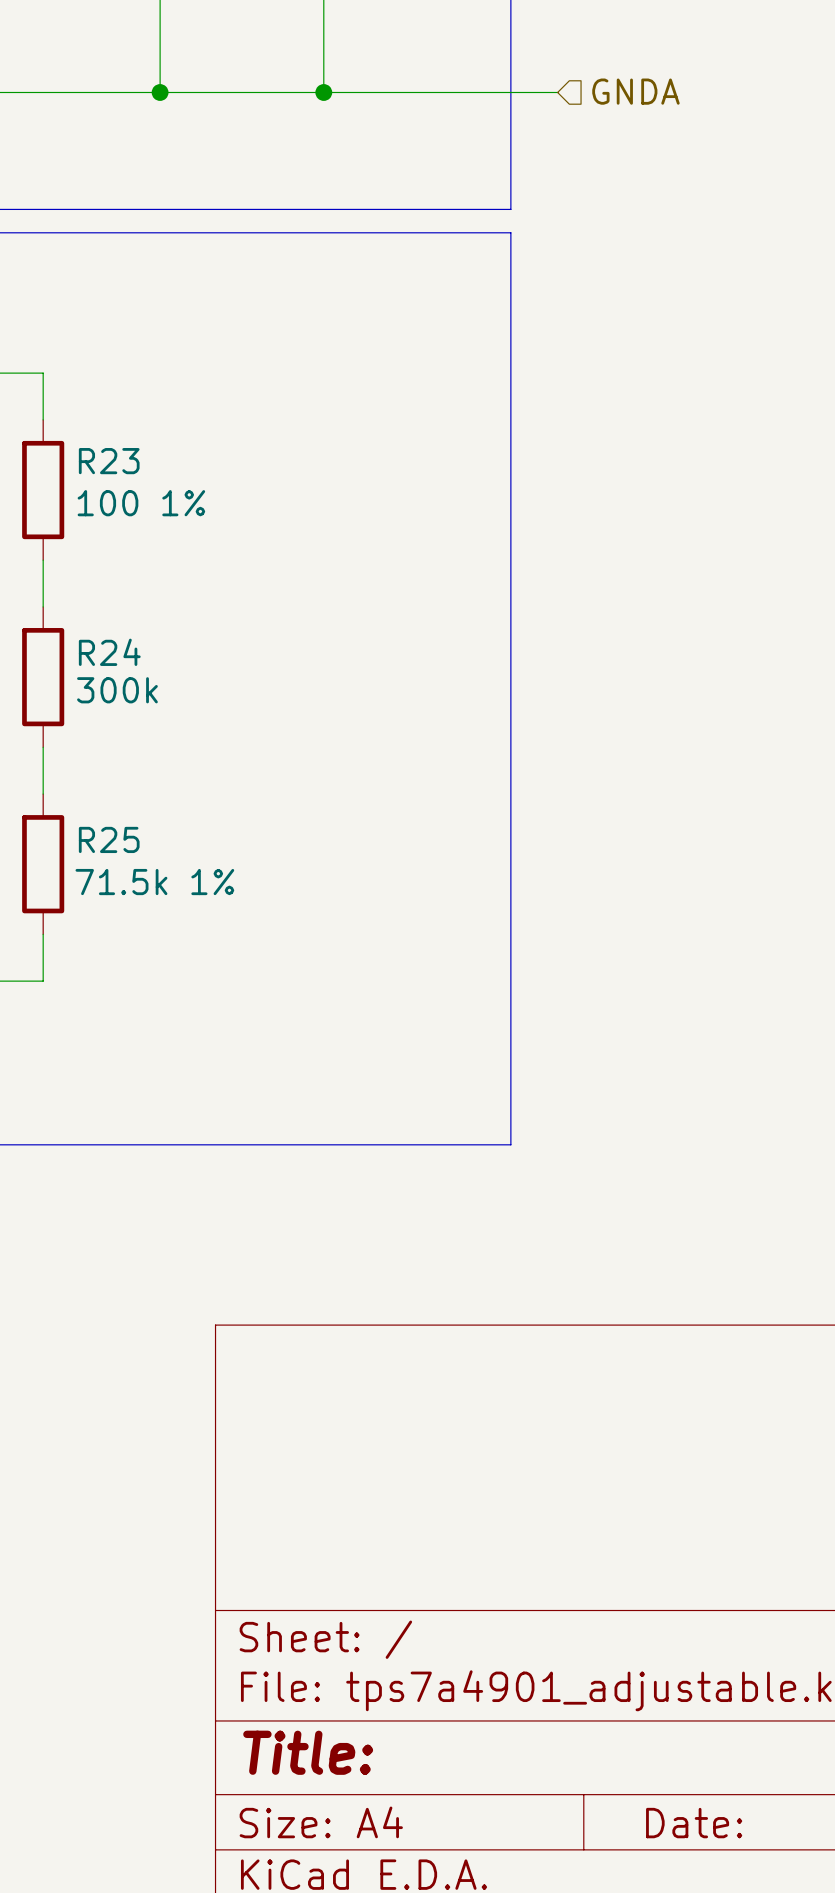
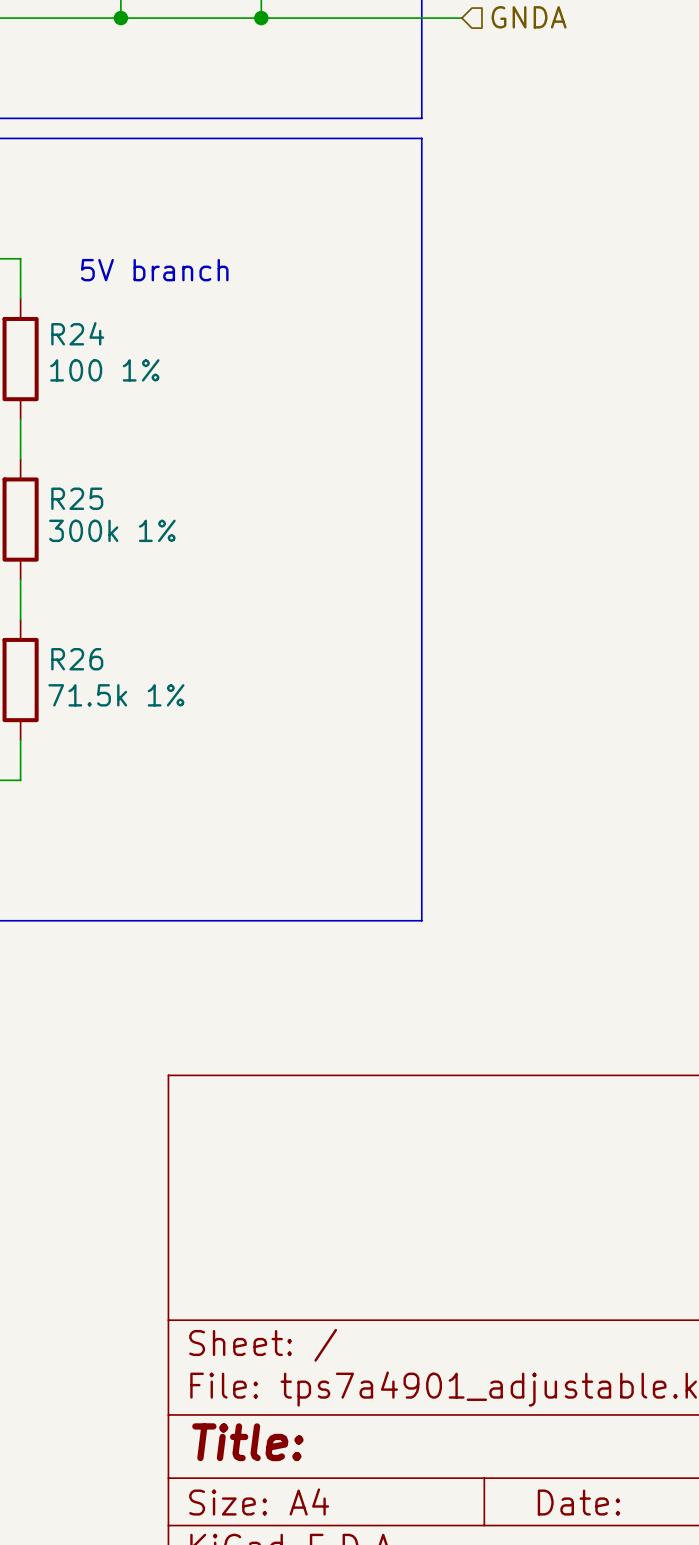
text: none -> 5V branch (154, 270)
R23 name: R23 (109, 461) -> R24 (77, 333)
R24 name: R24 (109, 652) -> R25 (77, 498)
R24 value: 300k (117, 690) -> 300k 1% (112, 530)
R25 name: R25 (109, 839) -> R26 (77, 659)

